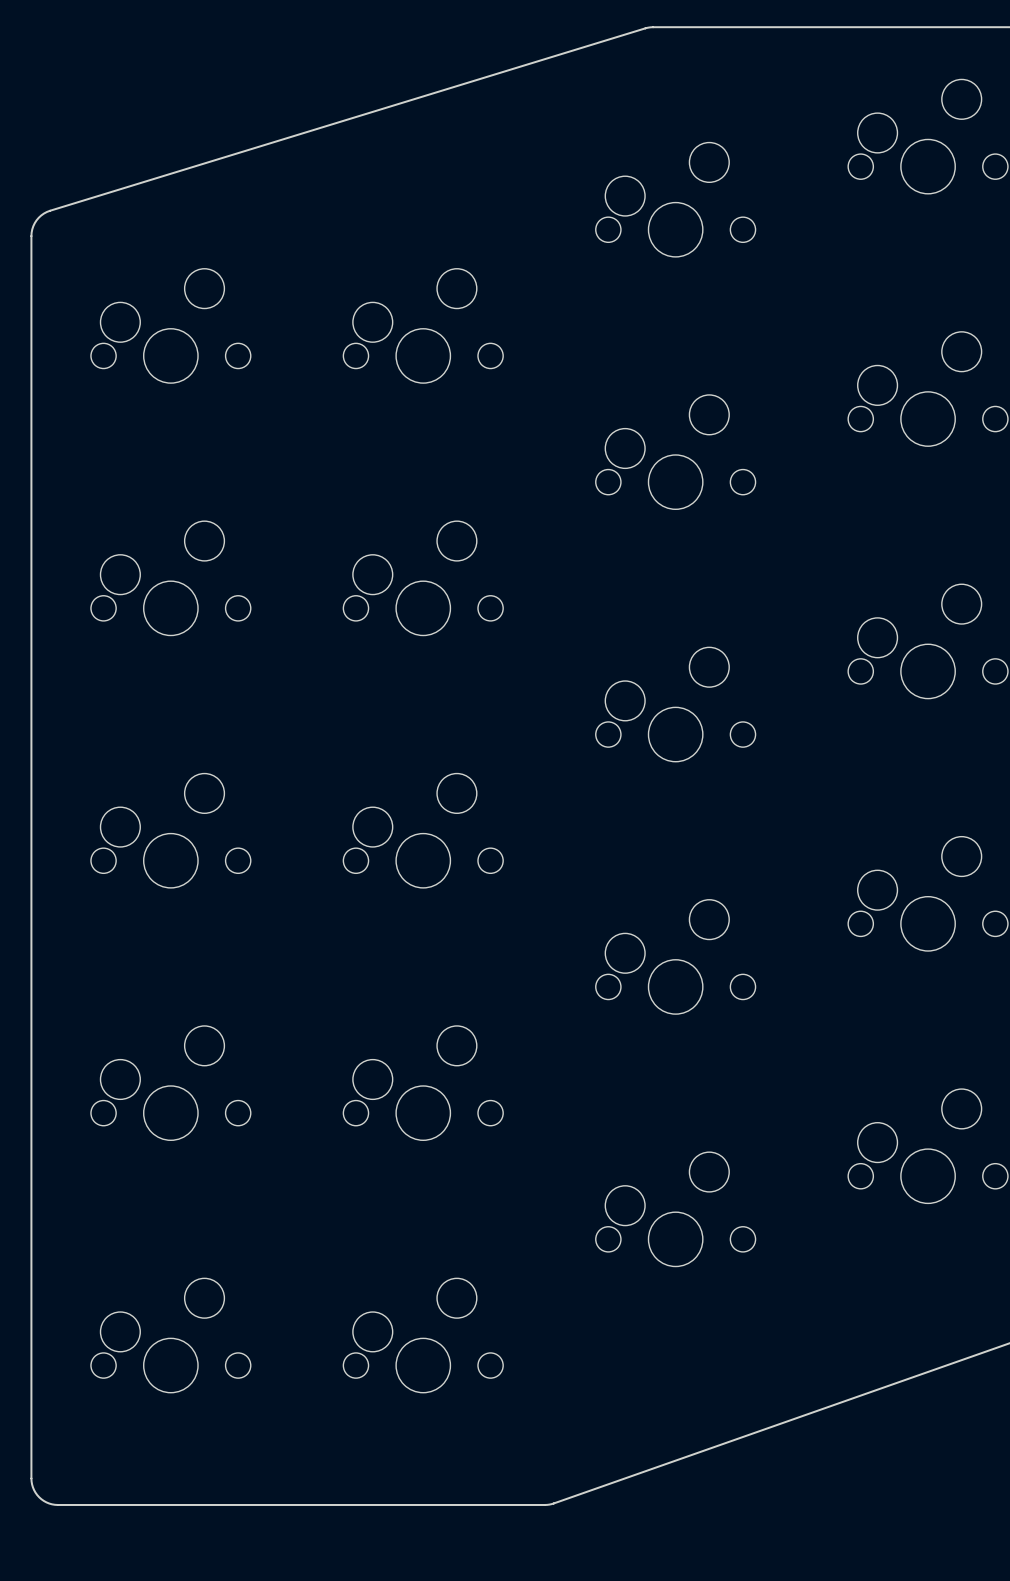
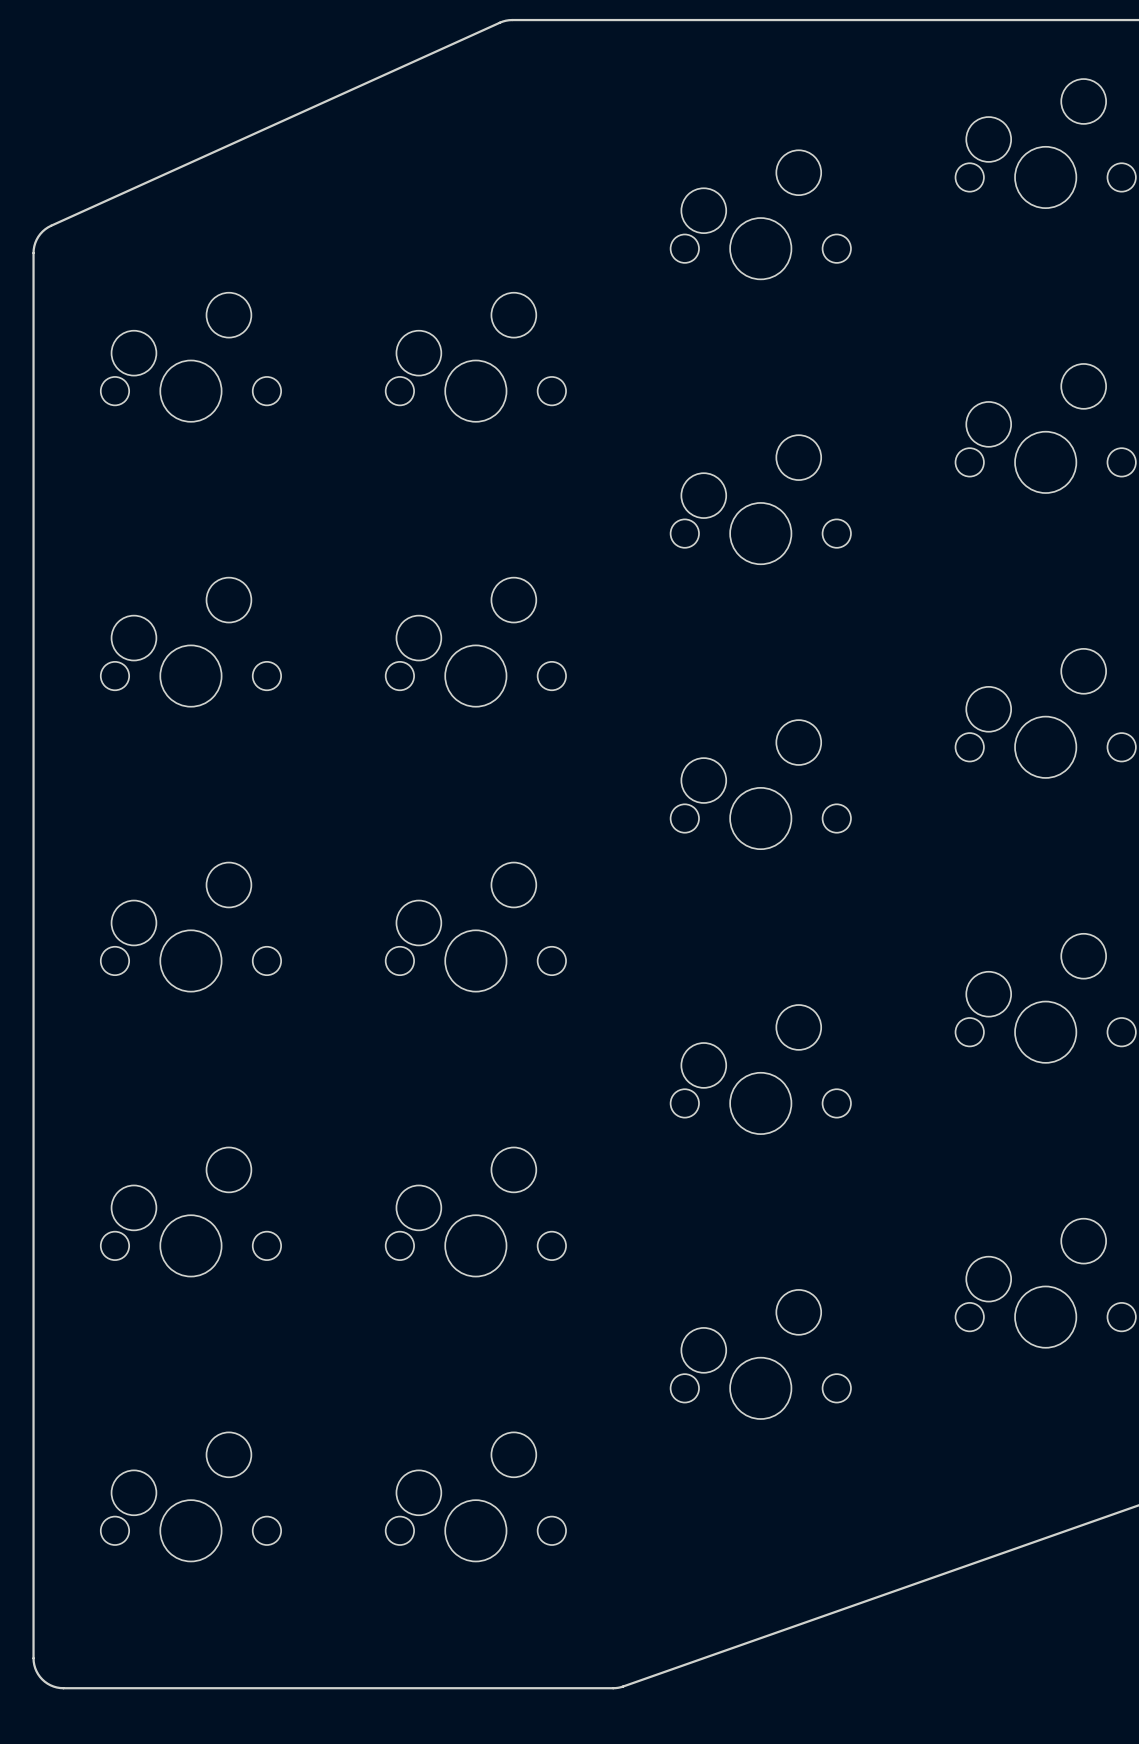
board edge: (653, 27) (50, 210) (36, 220) (31, 236) -> (735, 20) (502, 21) (51, 225) (38, 236) (34, 246) (33, 255)

